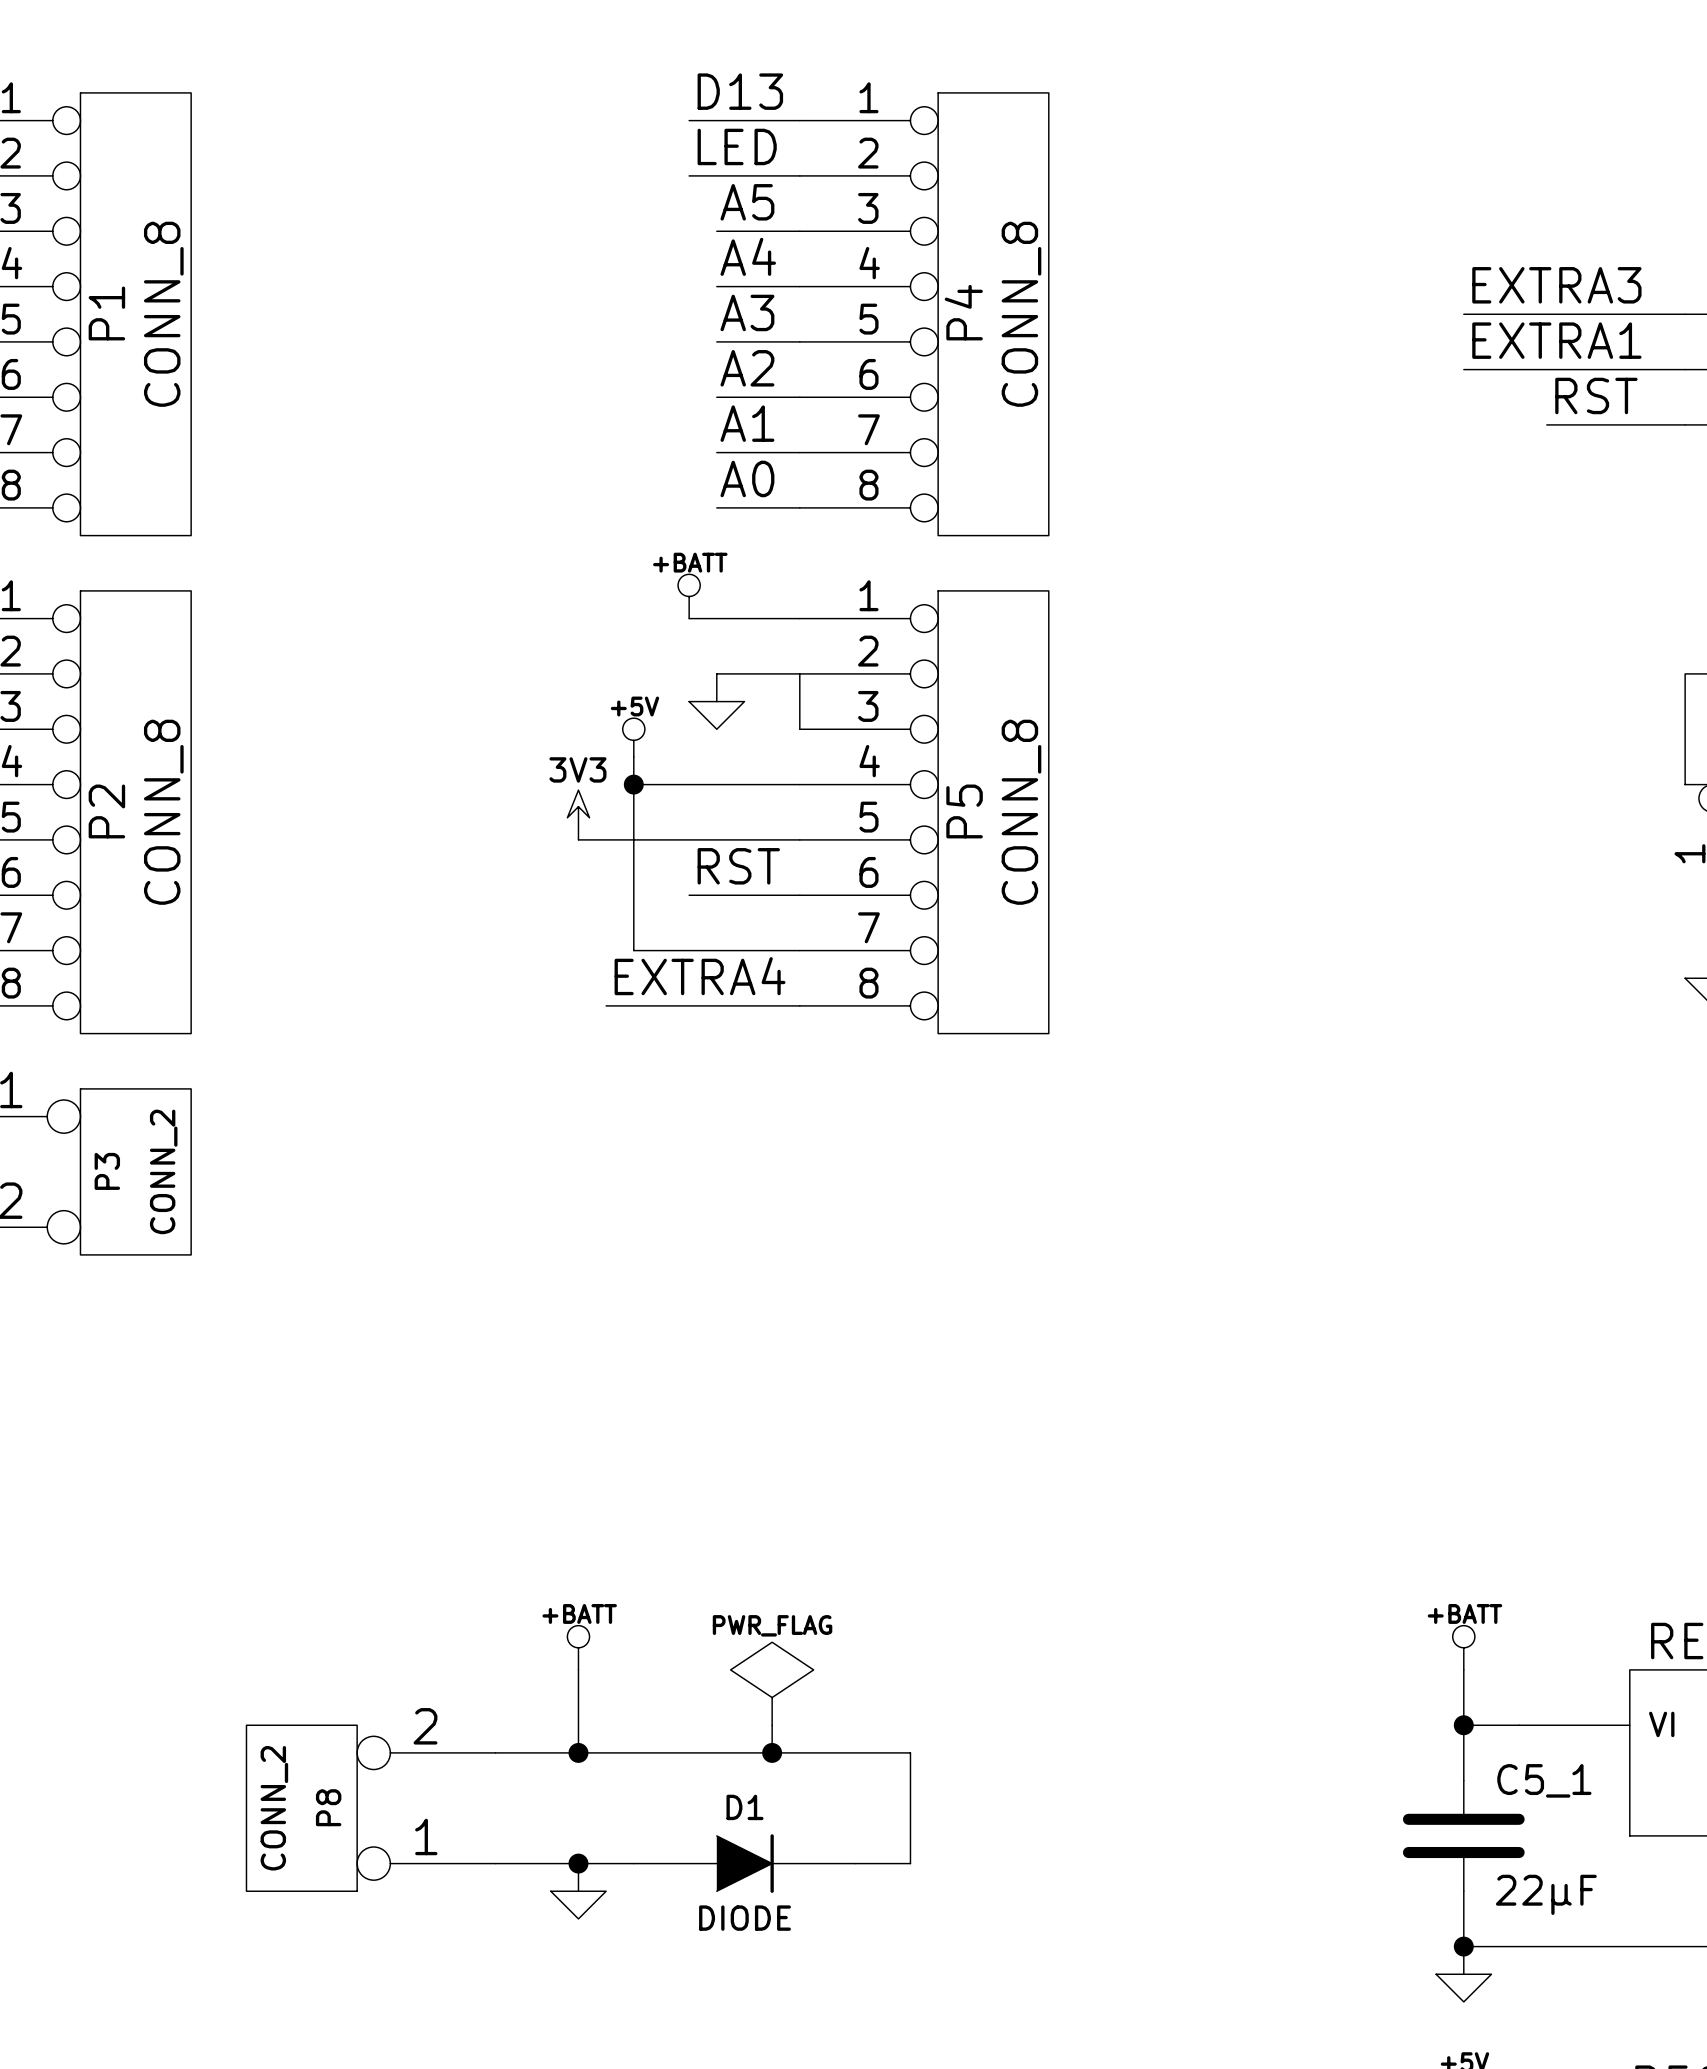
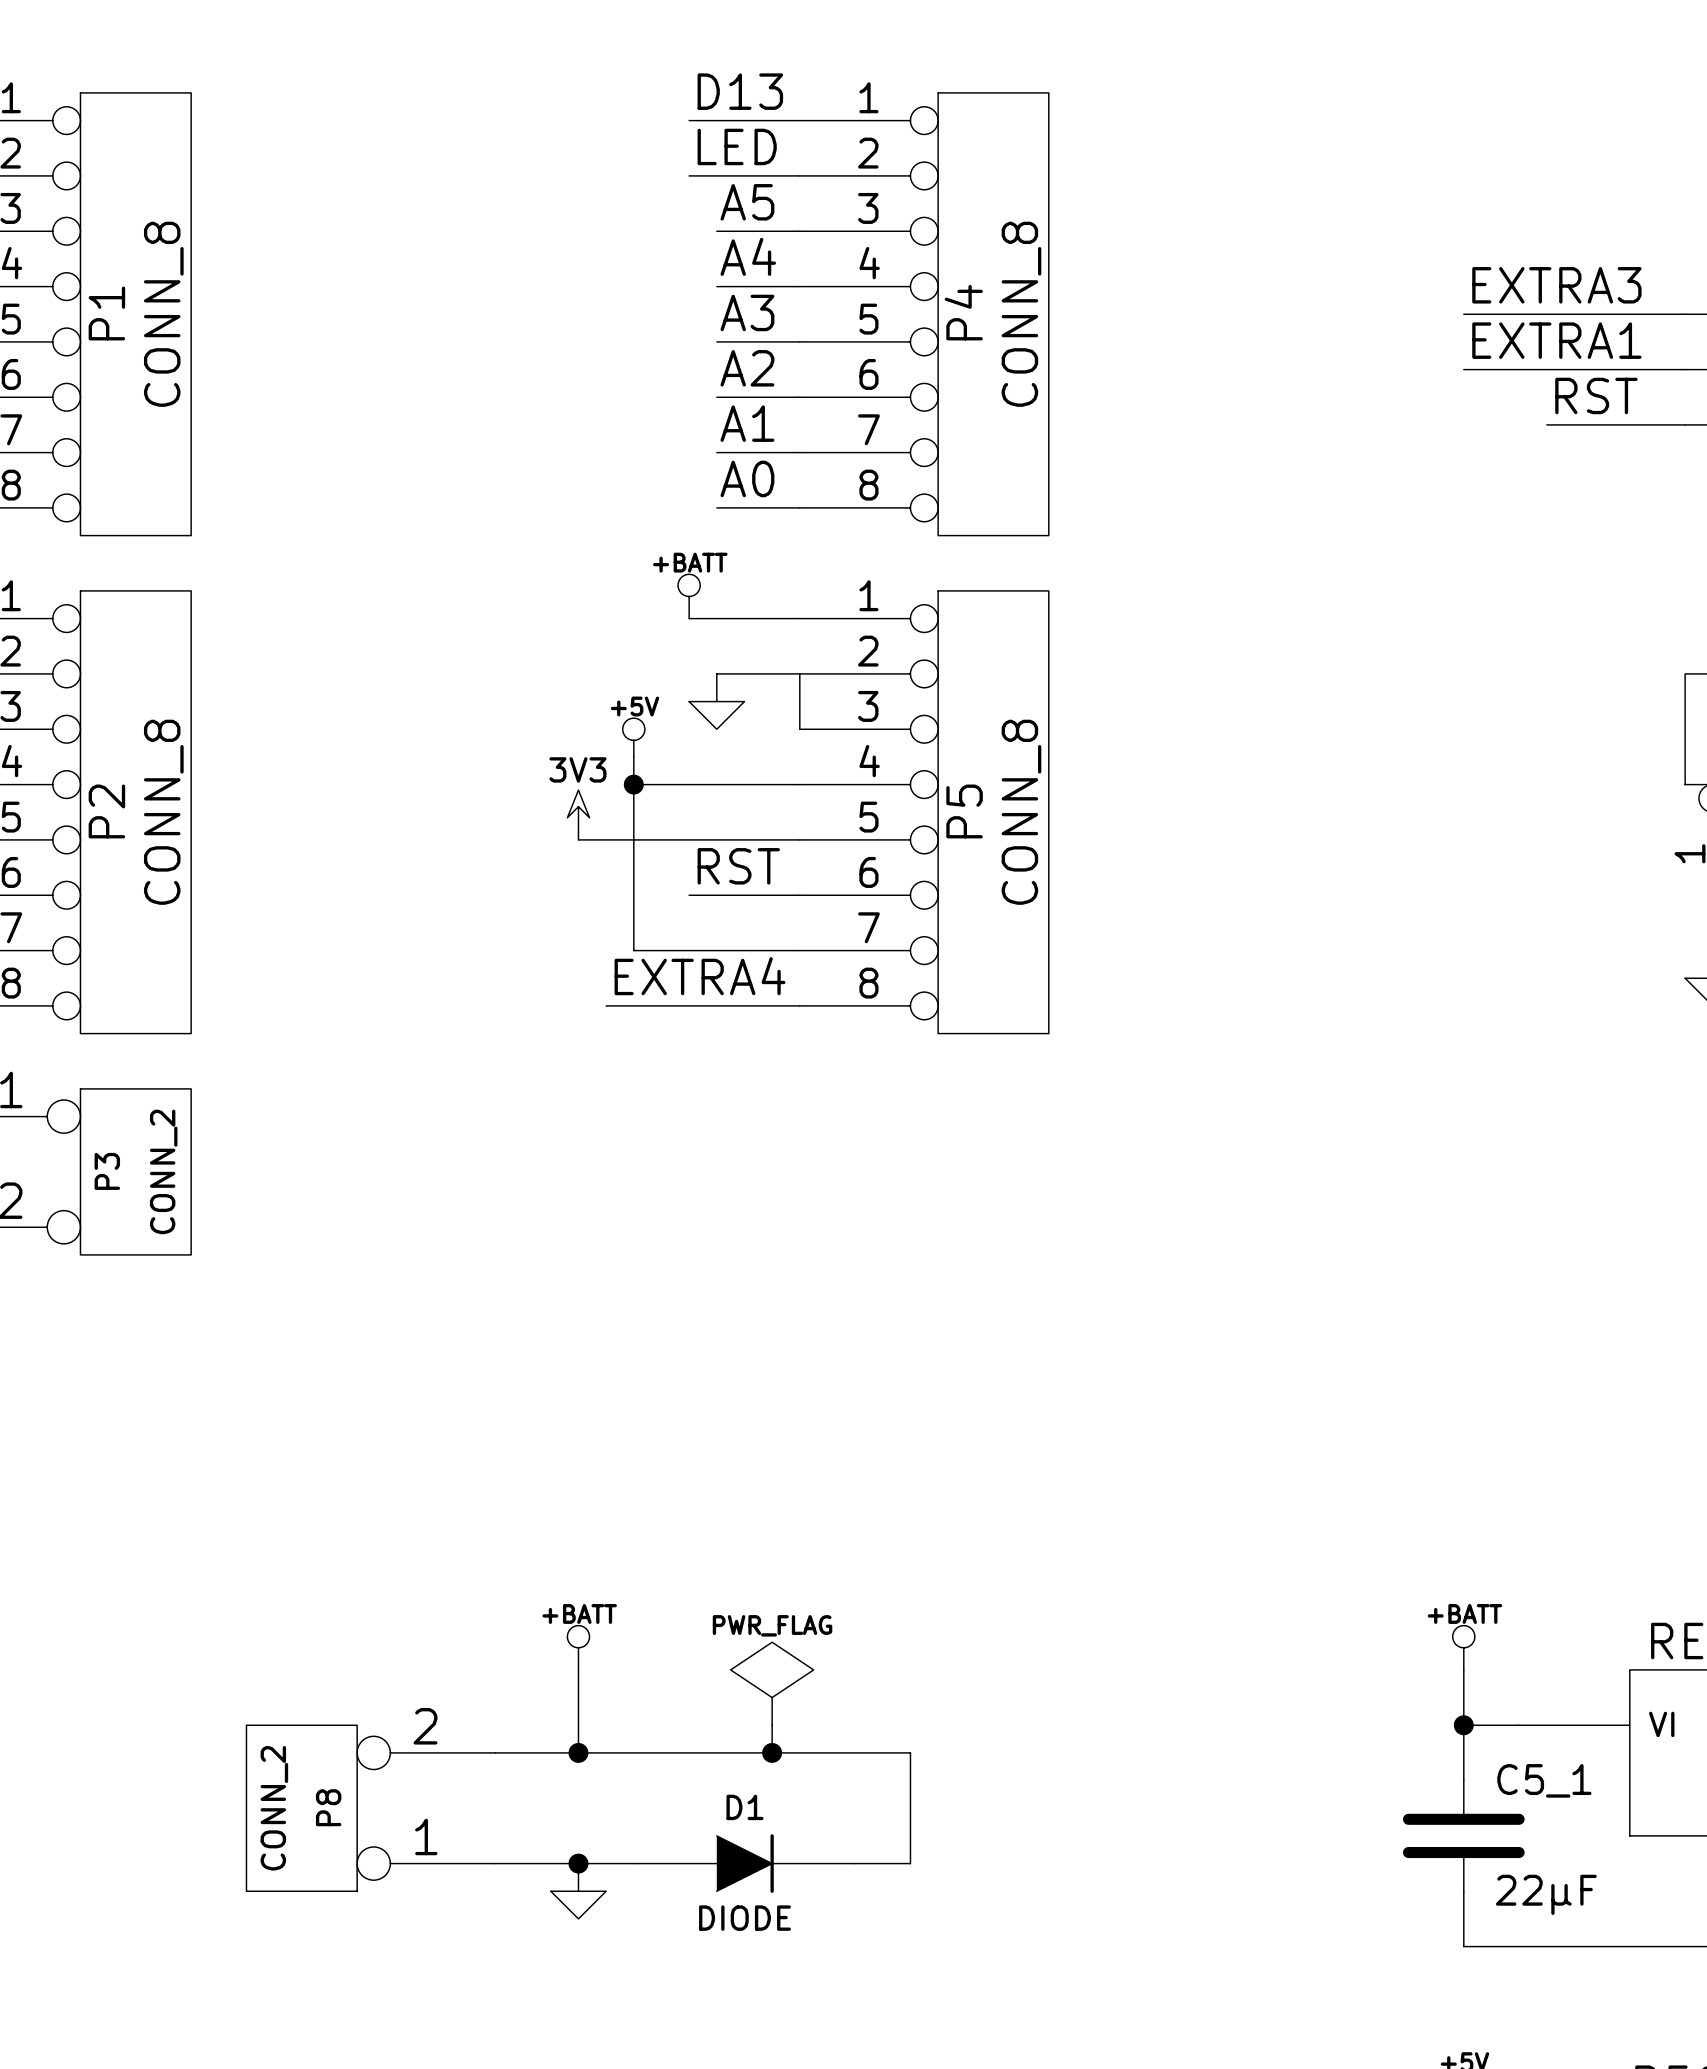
wire: (1463, 1946) (1463, 1974) -> none
junction: (1463, 1946) -> none
power symbol: (1463, 1988) -> none

